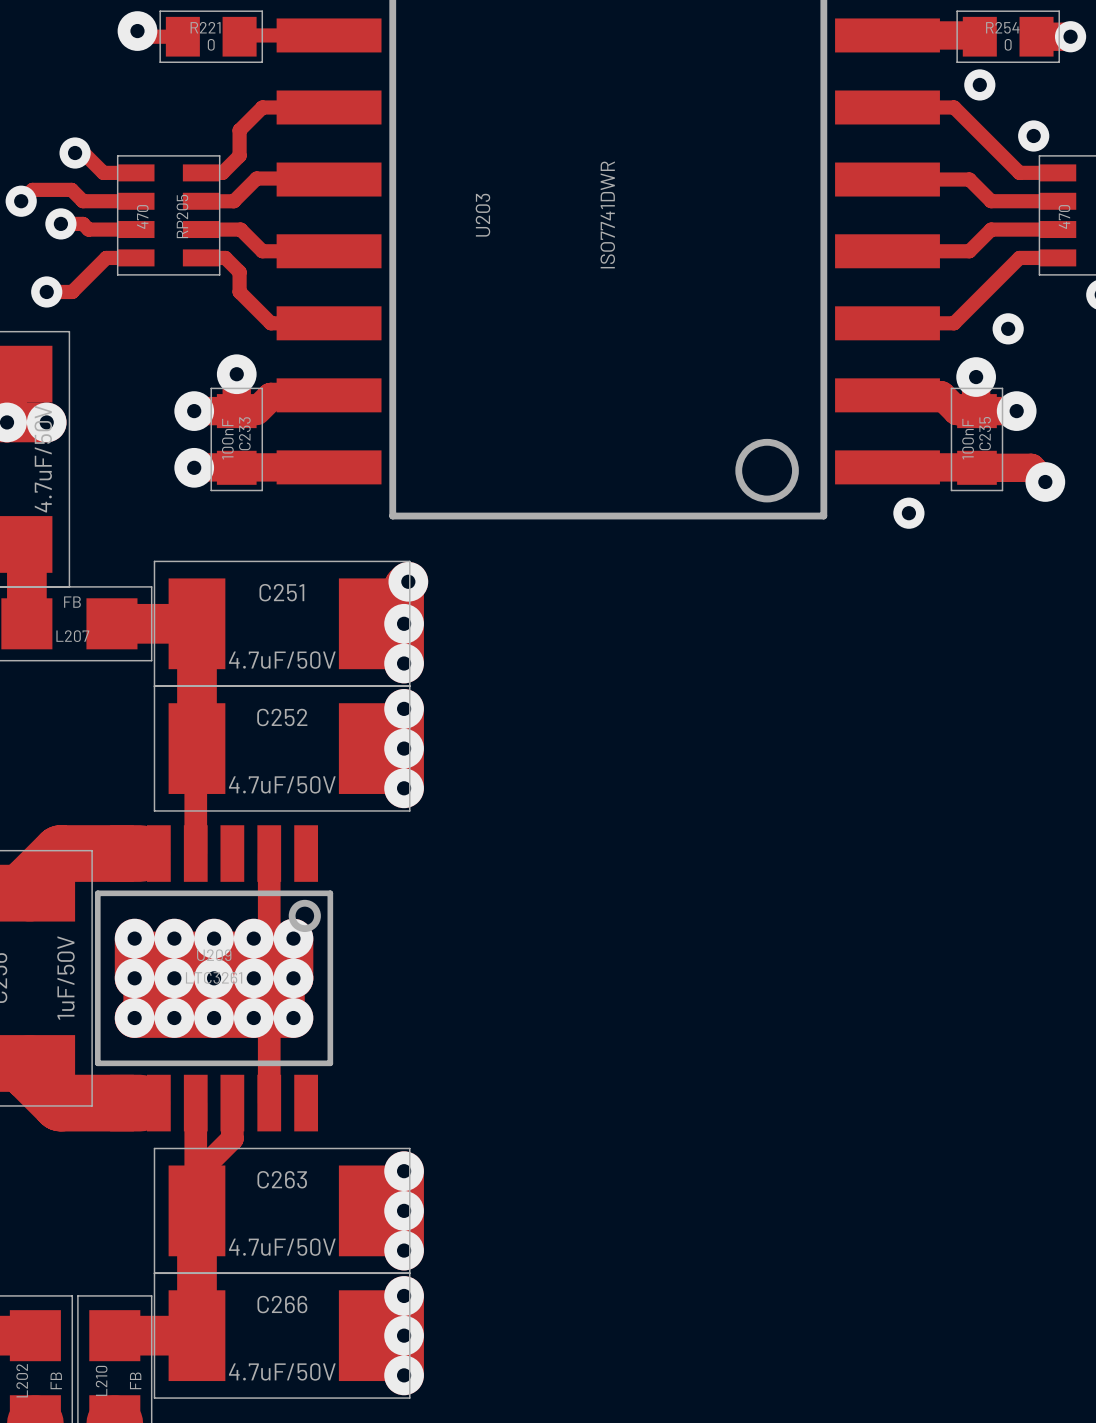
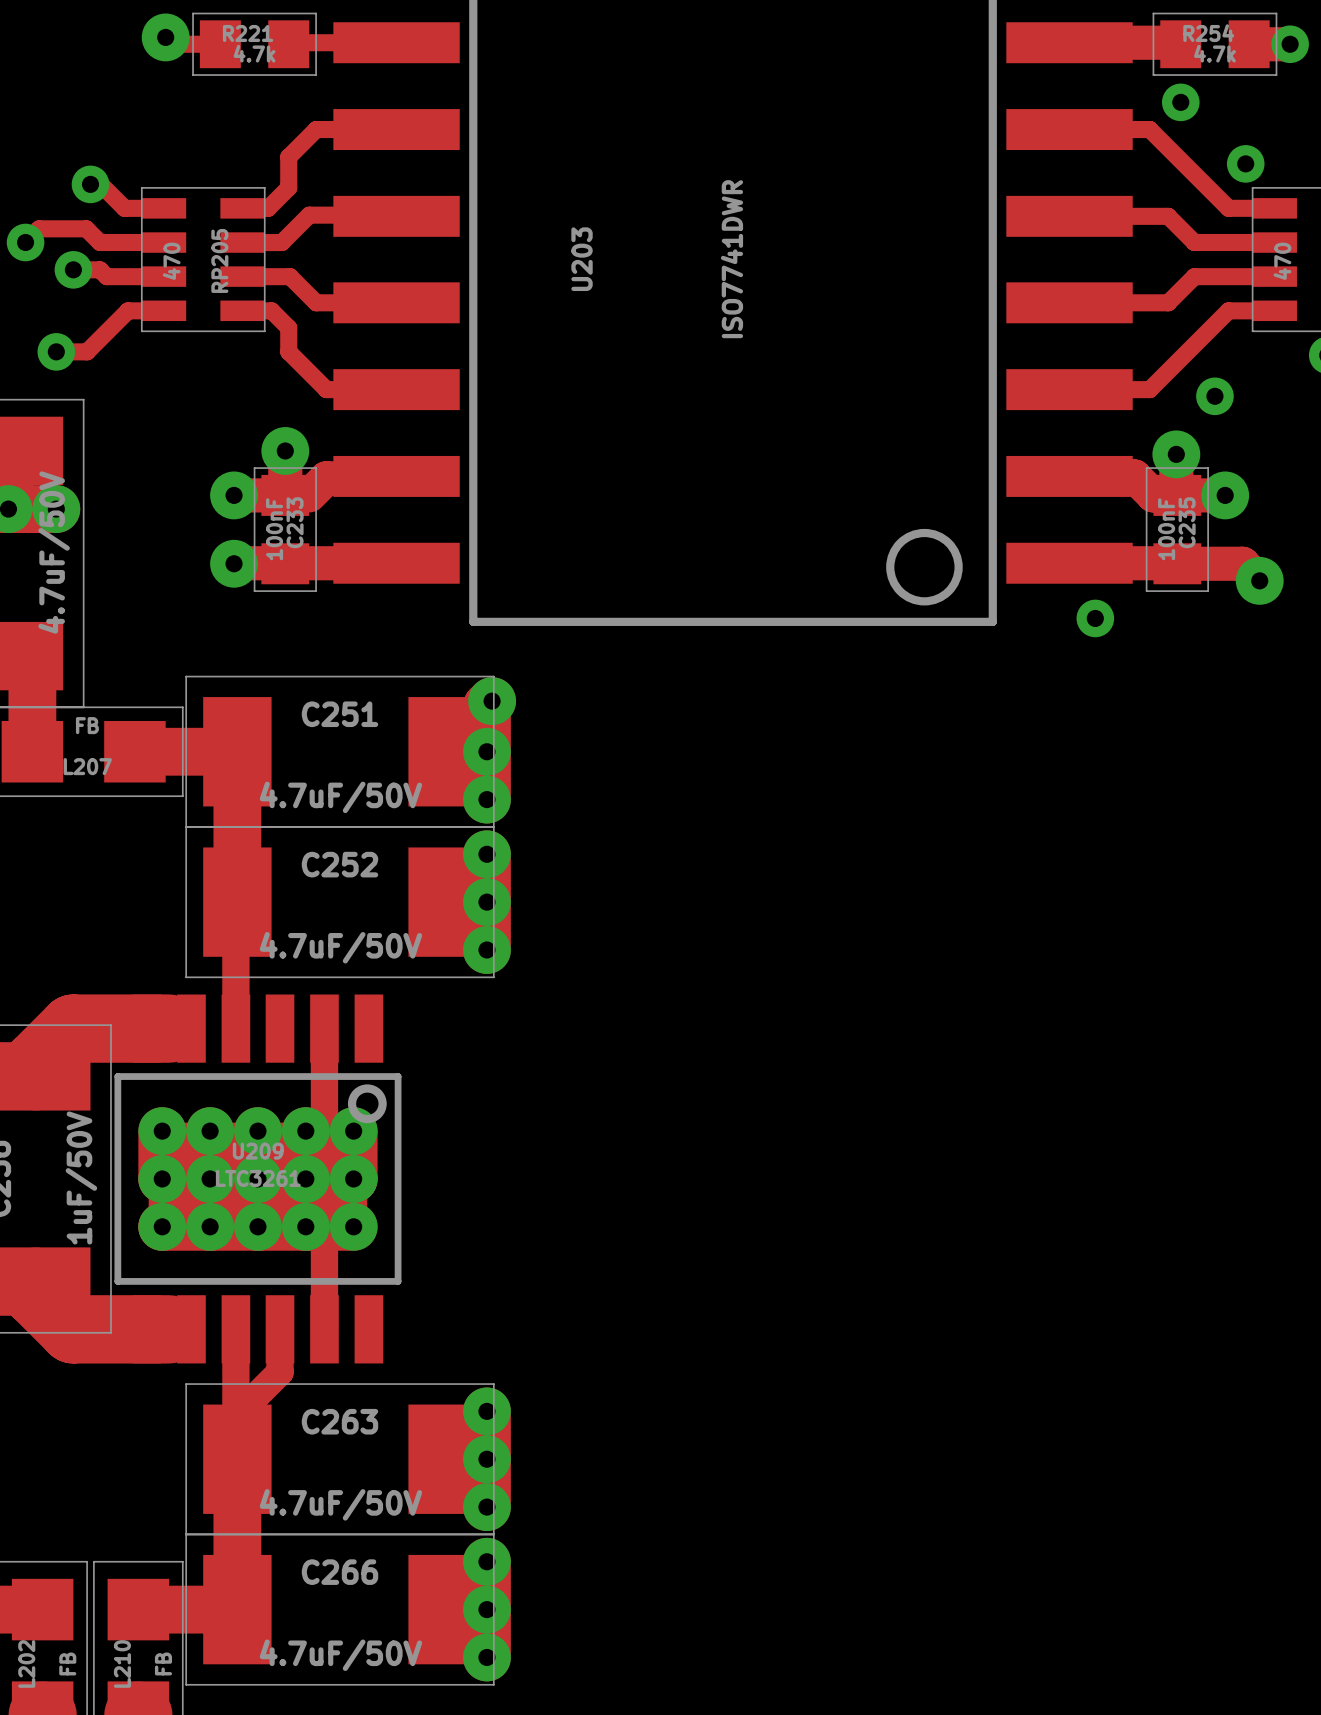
R221 value: 0 (211, 44) -> 4.7k (254, 53)
R254 value: 0 (1008, 44) -> 4.7k (1214, 53)

